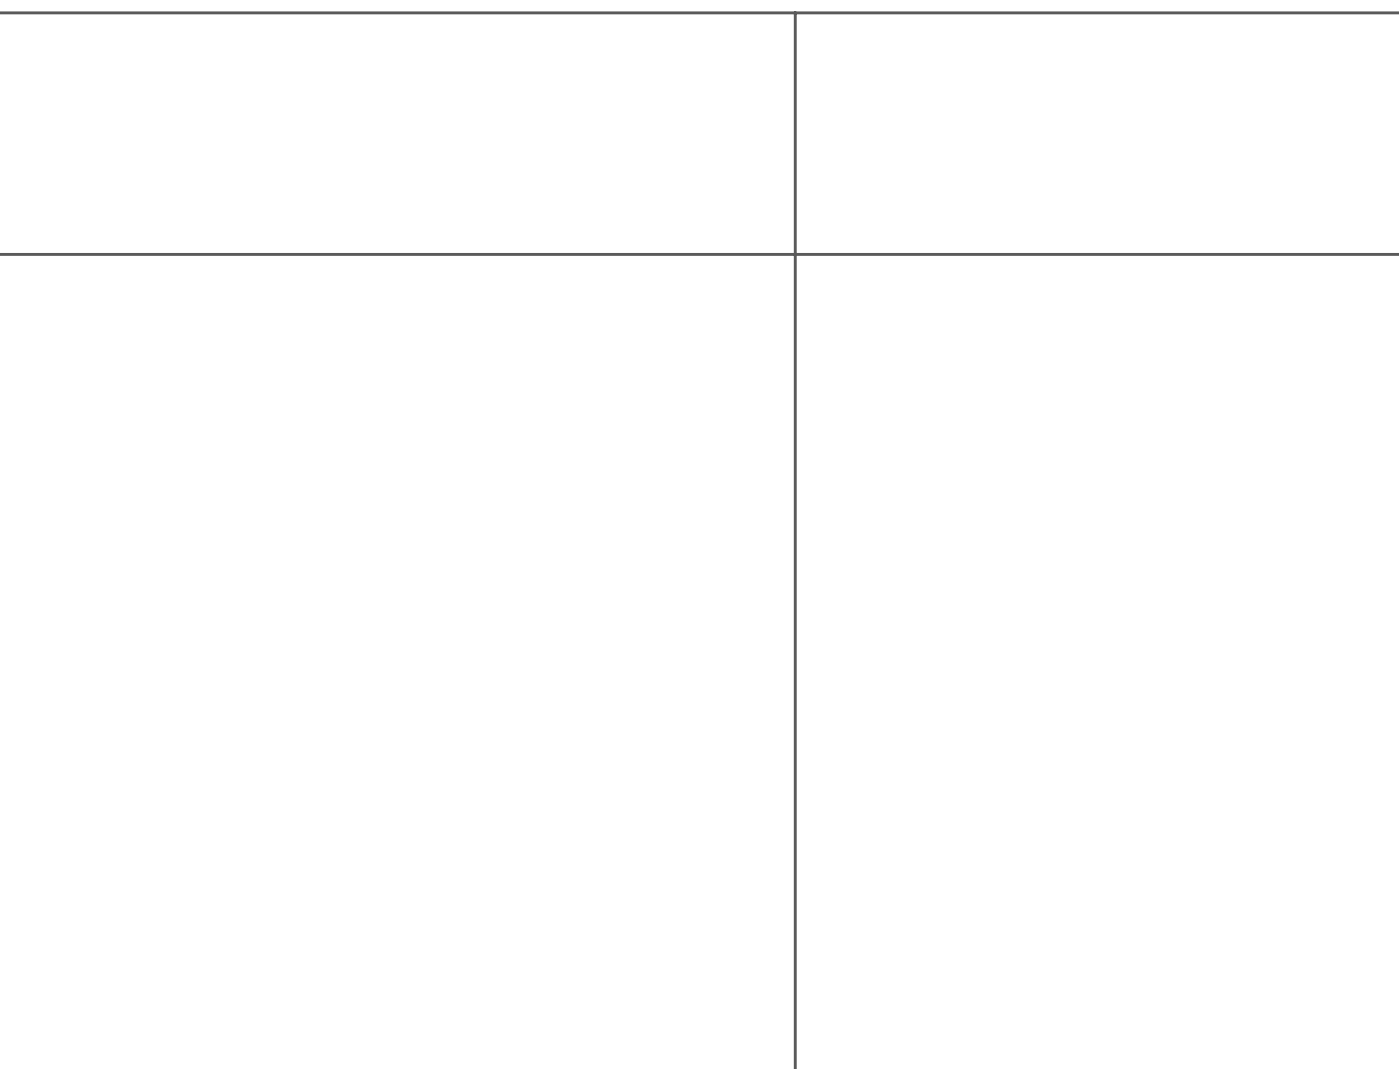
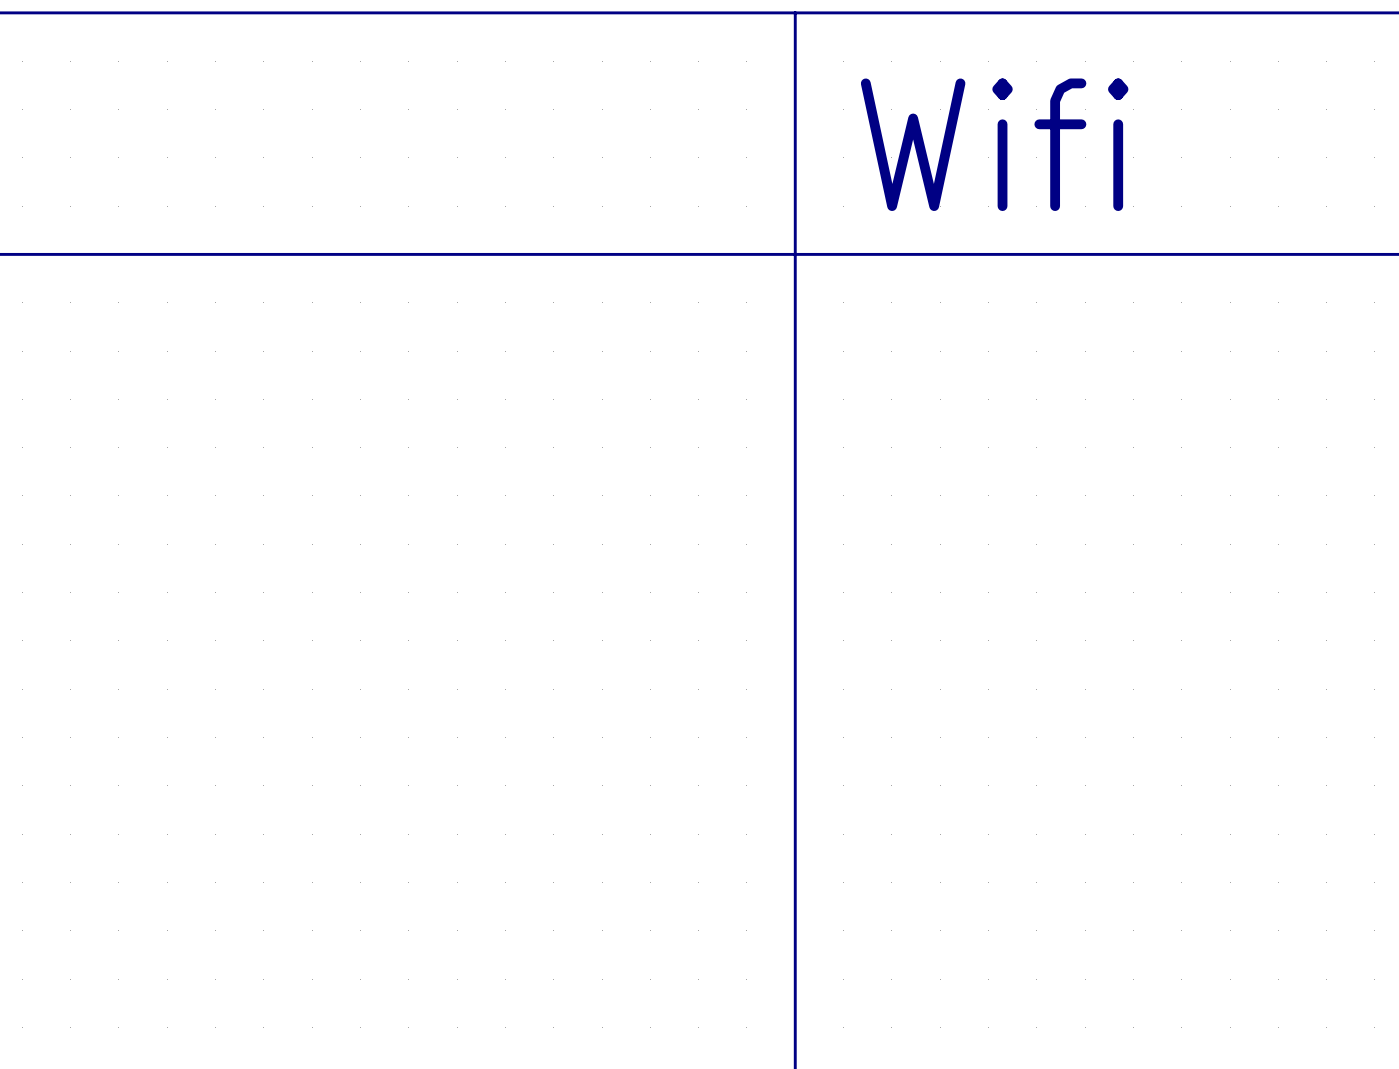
text: none -> Wifi (994, 144)

